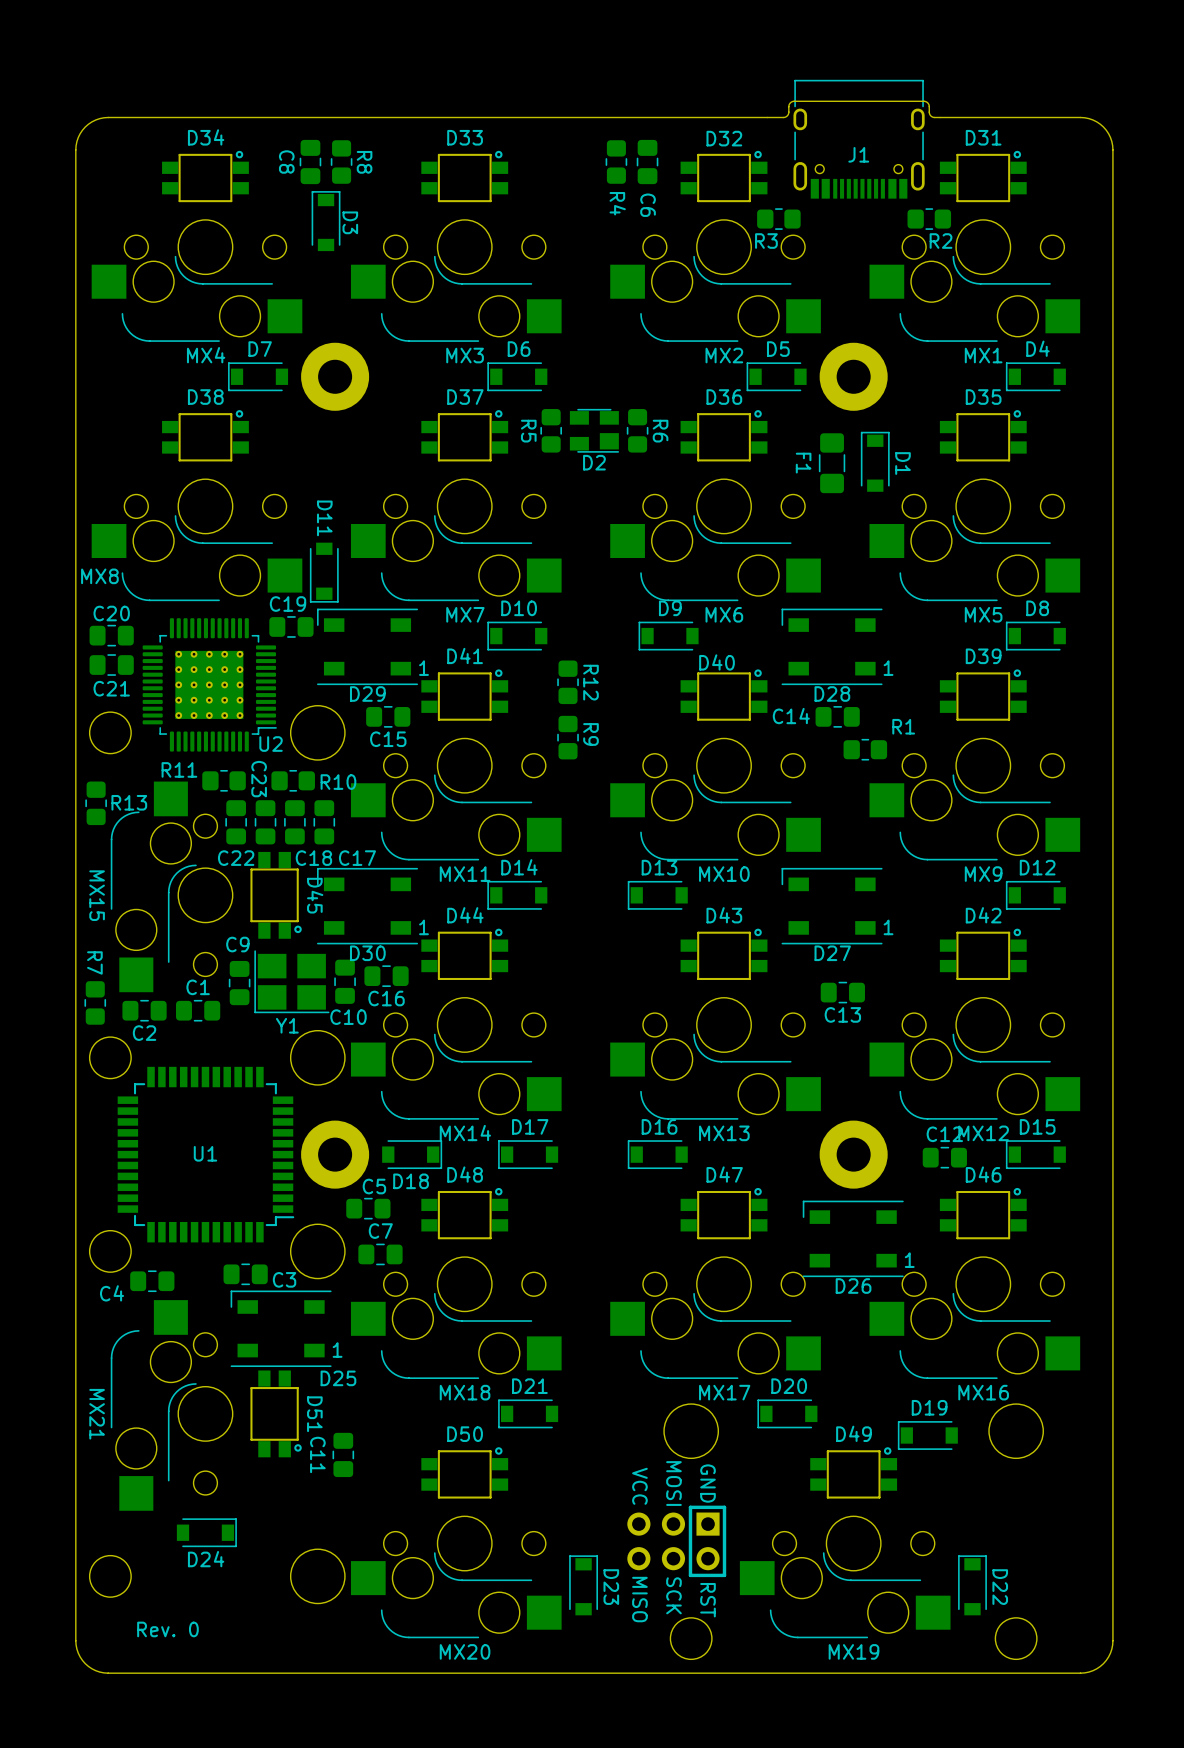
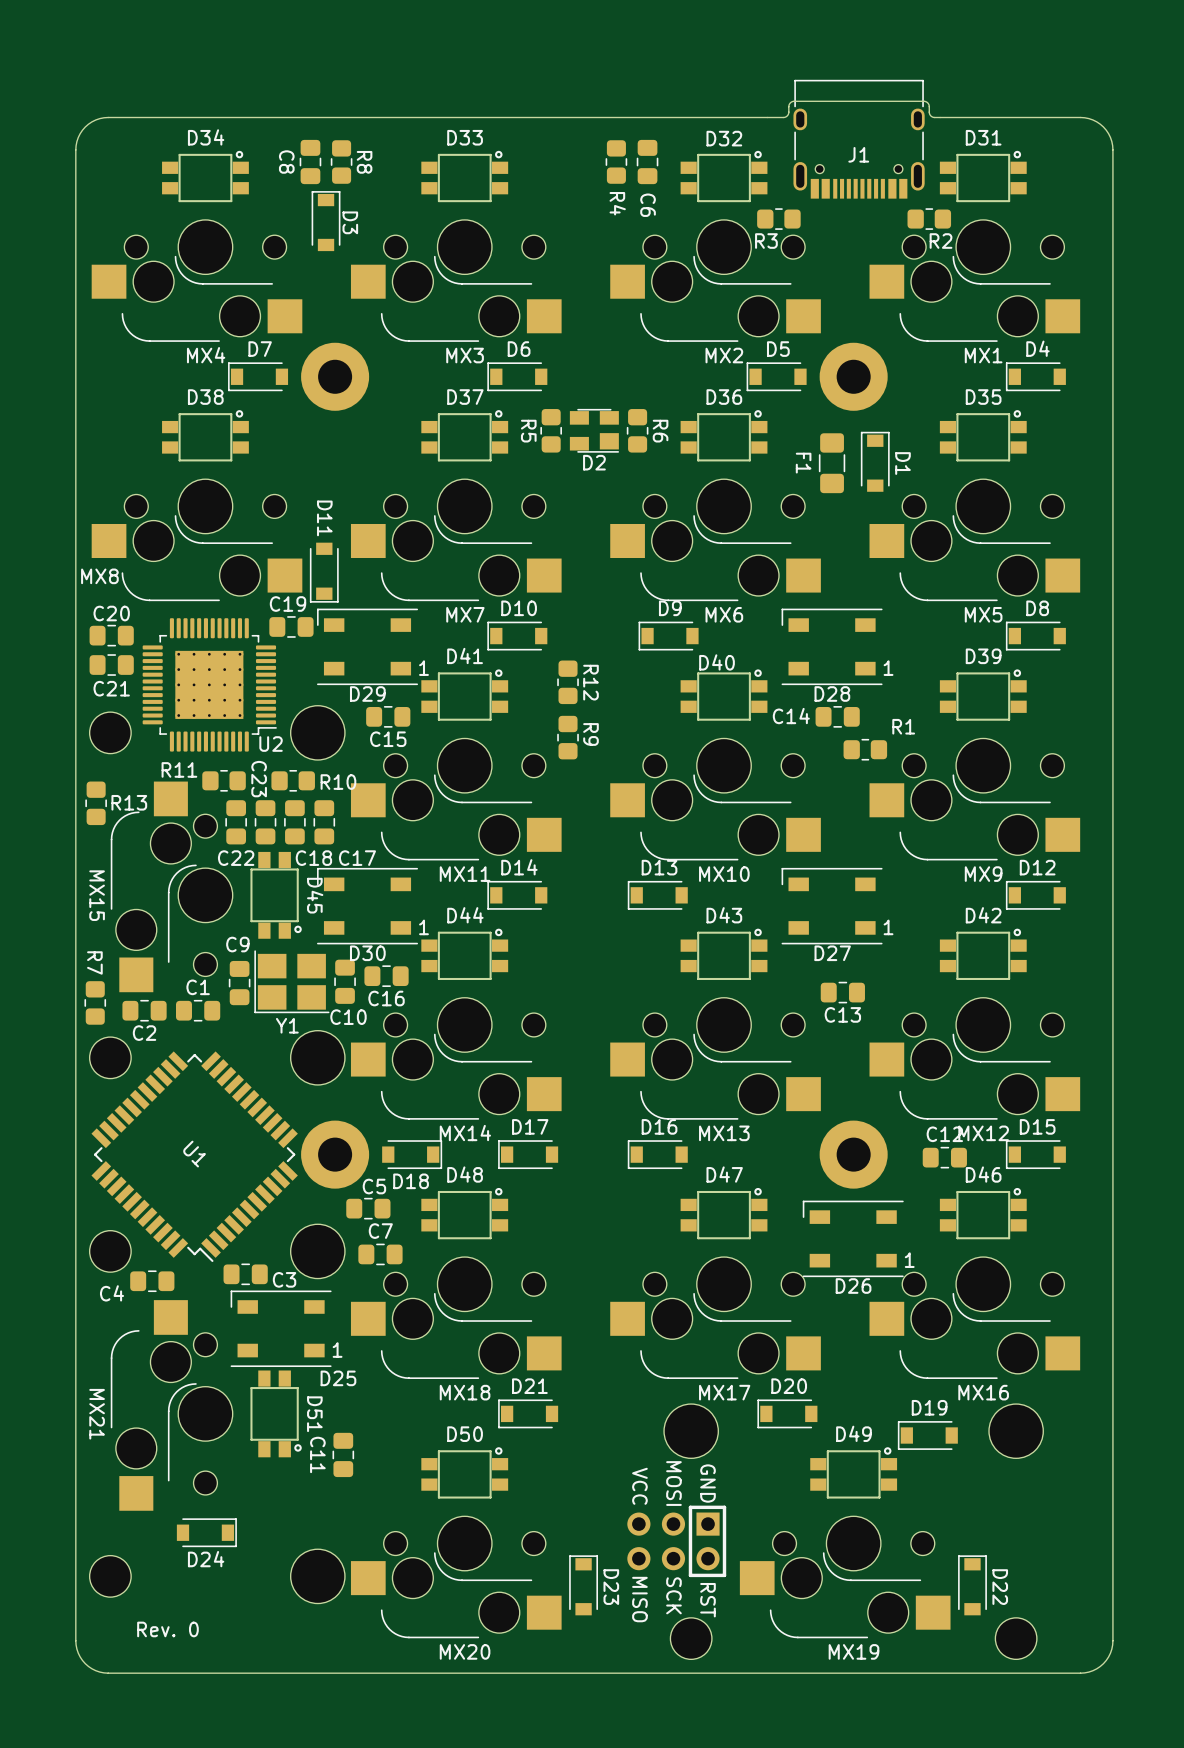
U1 rotation: 0° (205, 1154) -> 45° clockwise (194, 1156)

